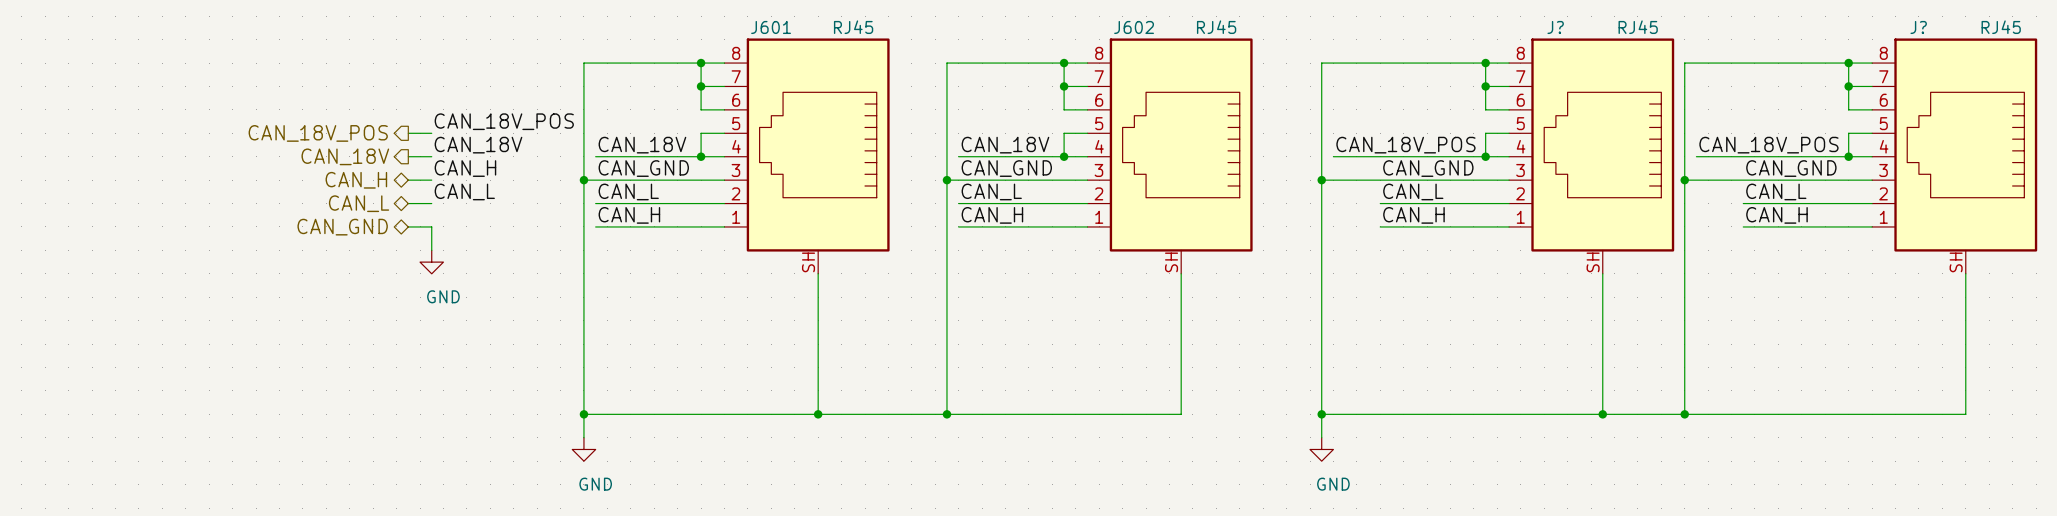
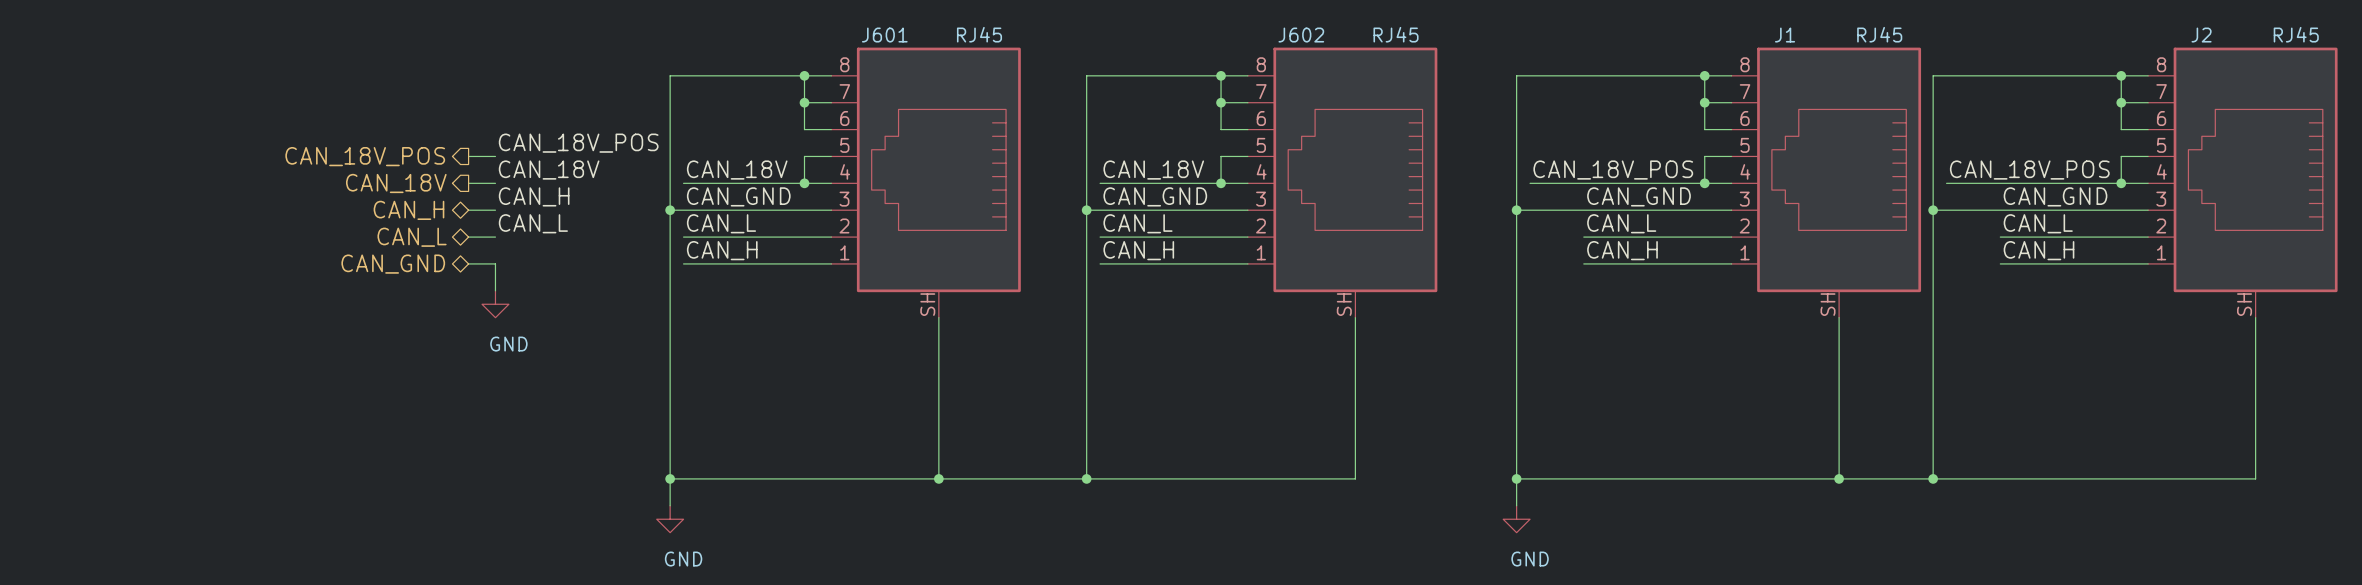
J? name: J? (1555, 27) -> J1 (1785, 35)
J? name: J? (1918, 27) -> J2 (2201, 35)

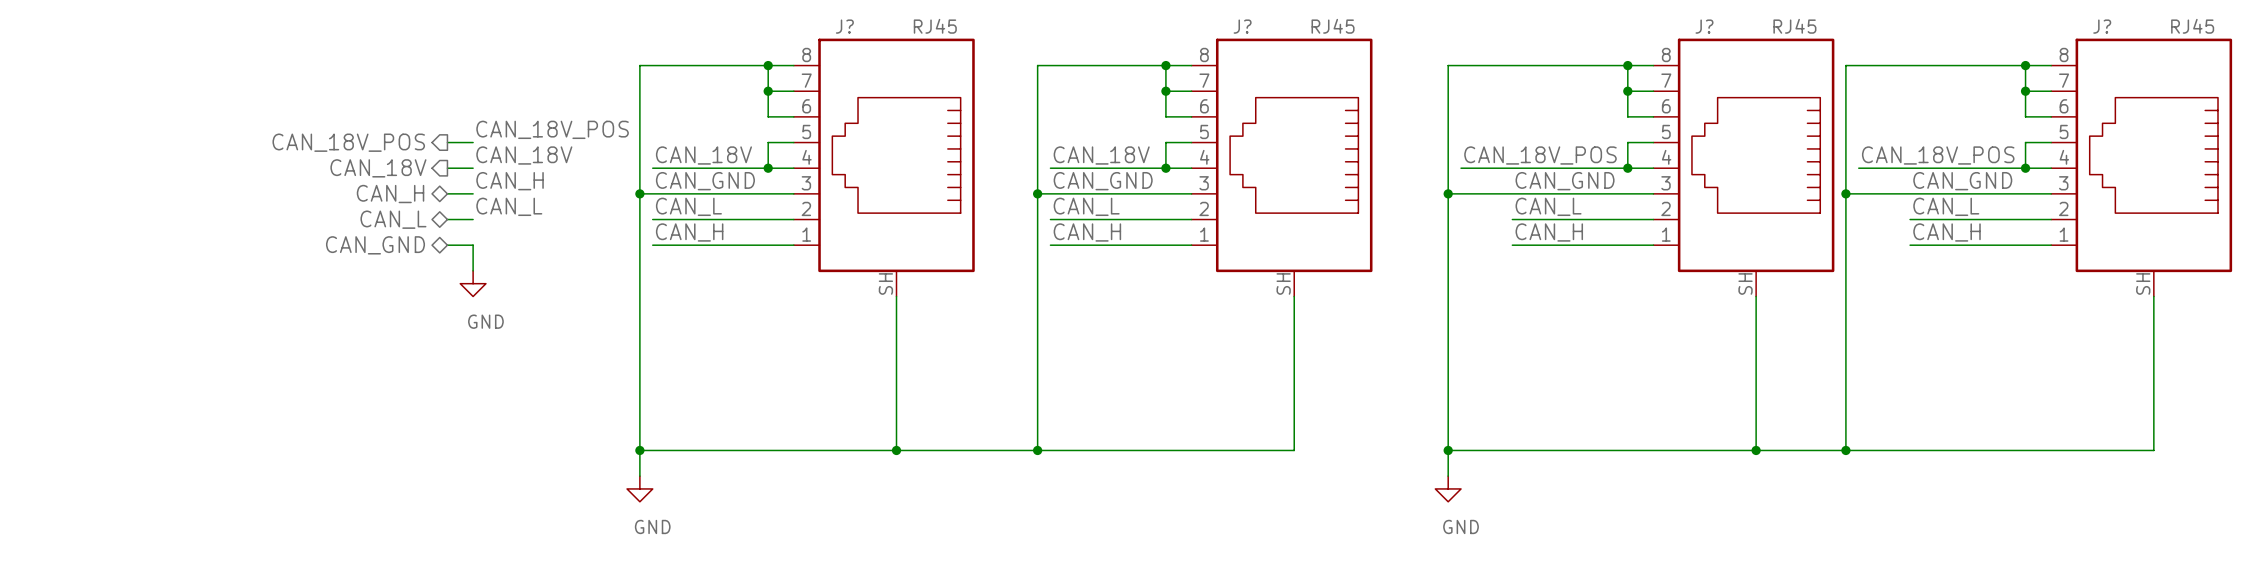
J601 name: J601 (884, 35) -> J? (844, 26)
J602 name: J602 (1301, 35) -> J? (1242, 26)
J1 name: J1 (1785, 35) -> J? (1704, 26)
J2 name: J2 (2201, 35) -> J? (2102, 26)

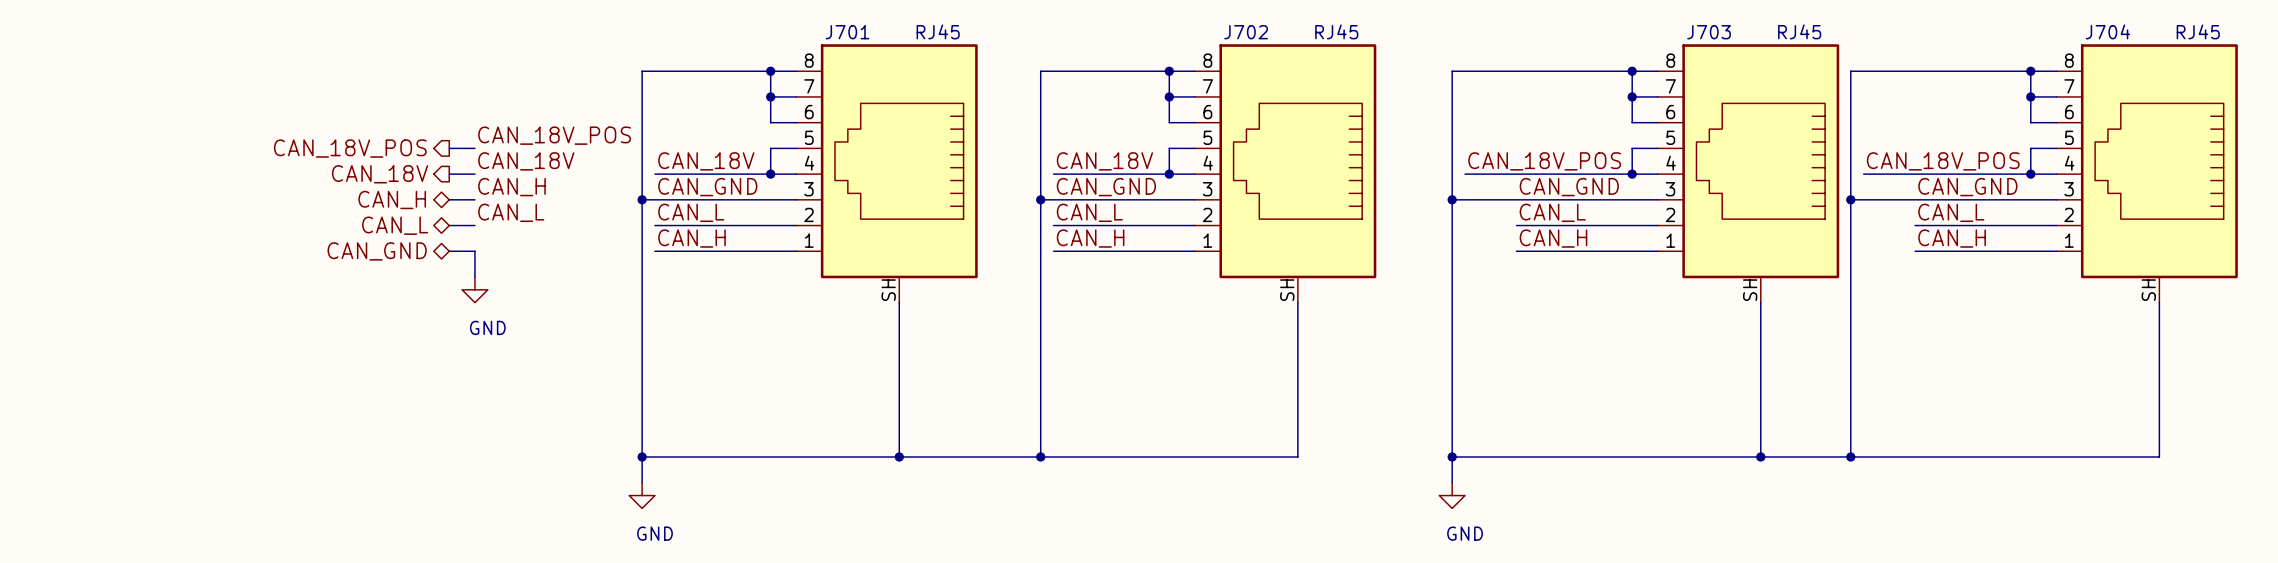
J? name: J? (844, 26) -> J701 (847, 32)
J? name: J? (1242, 26) -> J702 (1246, 32)
J? name: J? (1704, 26) -> J703 (1709, 32)
J? name: J? (2102, 26) -> J704 (2107, 31)

